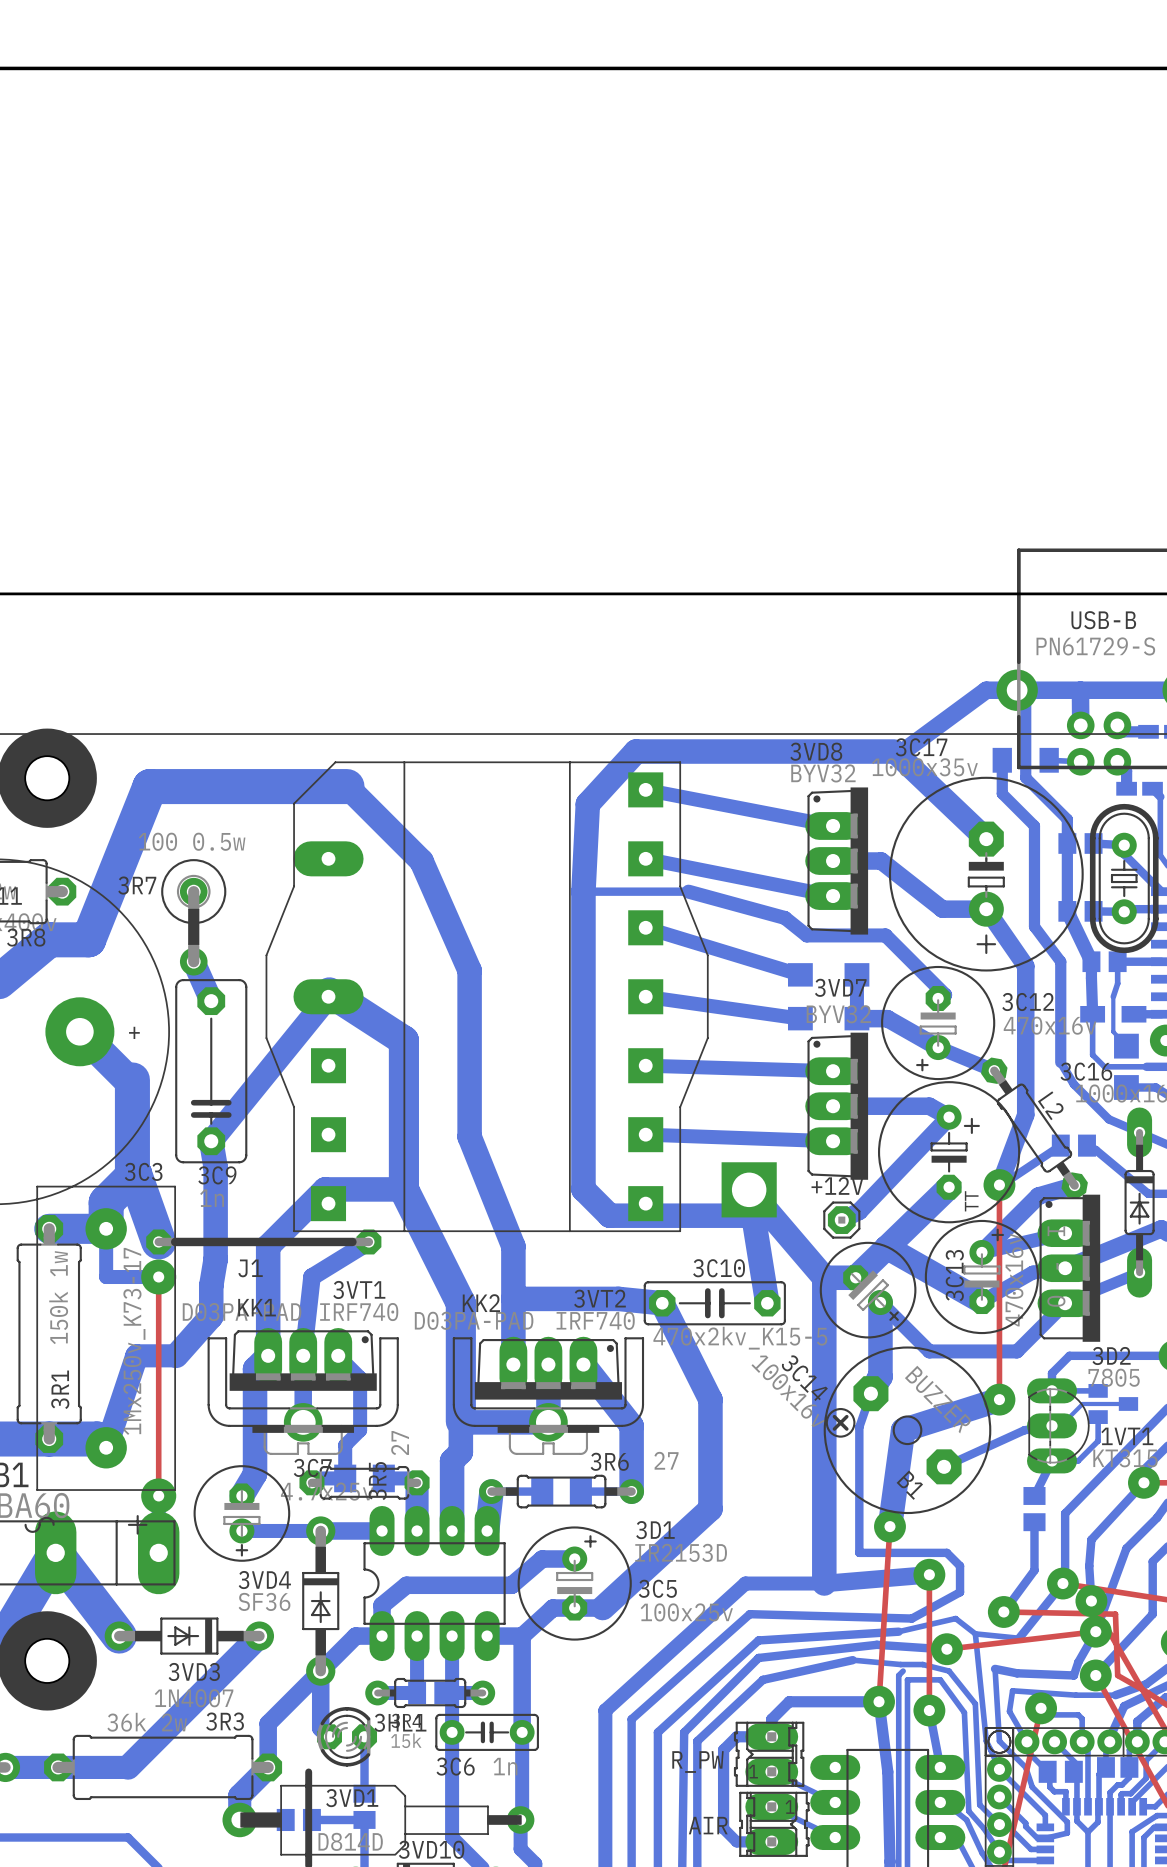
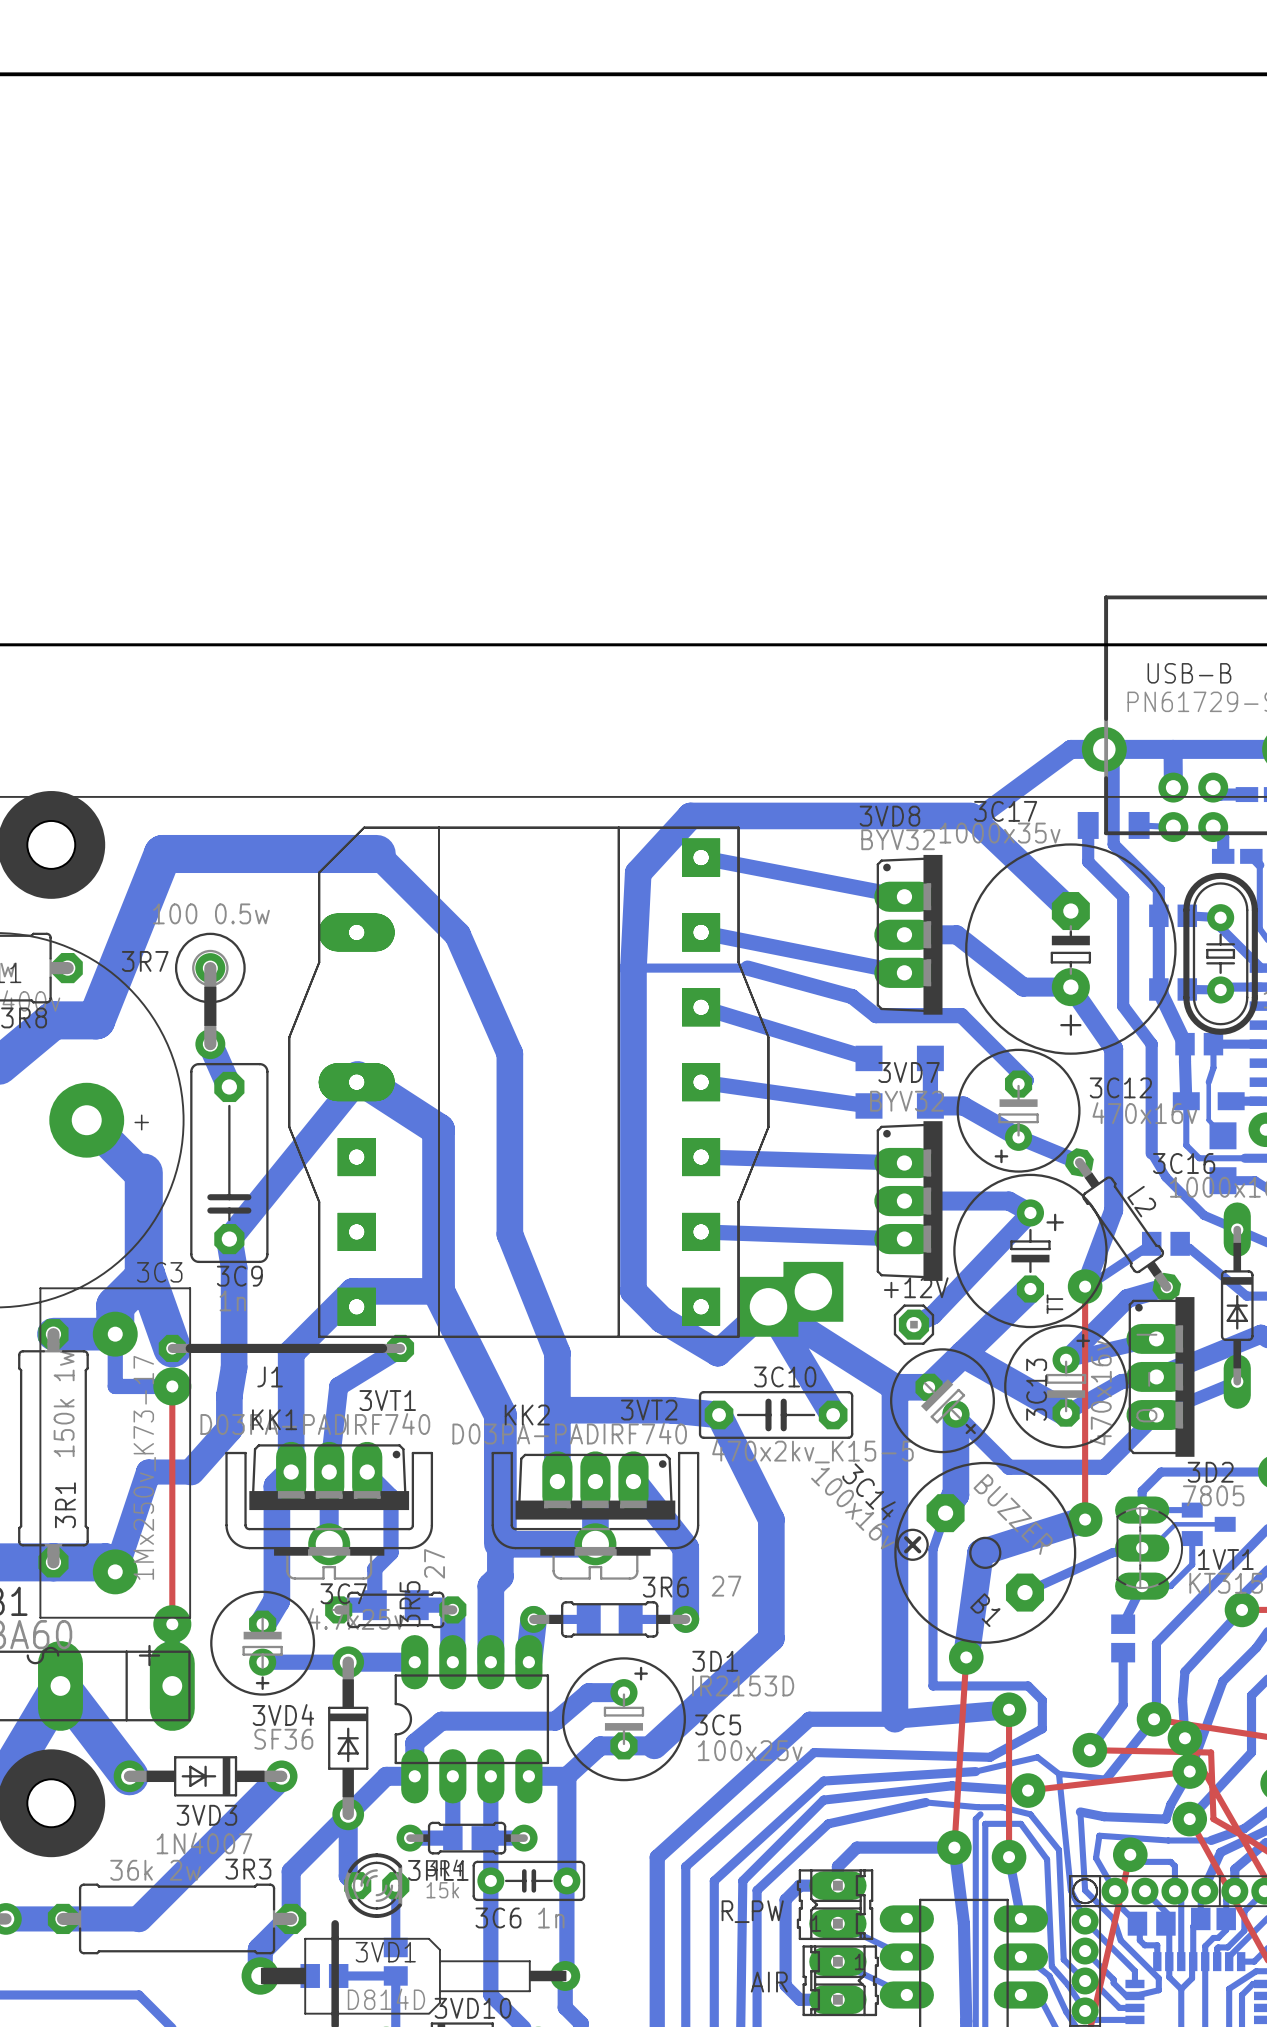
part: none -> (543, 1082)
bottom track: (749, 1189) (766, 1215) (609, 1215) -> (768, 1306) (717, 1353) (661, 1319)
bottom track: (749, 1189) (767, 1303) -> (768, 1306) (833, 1414)
bottom track: (749, 1189) (824, 1277) -> (768, 1306) (894, 1387)

